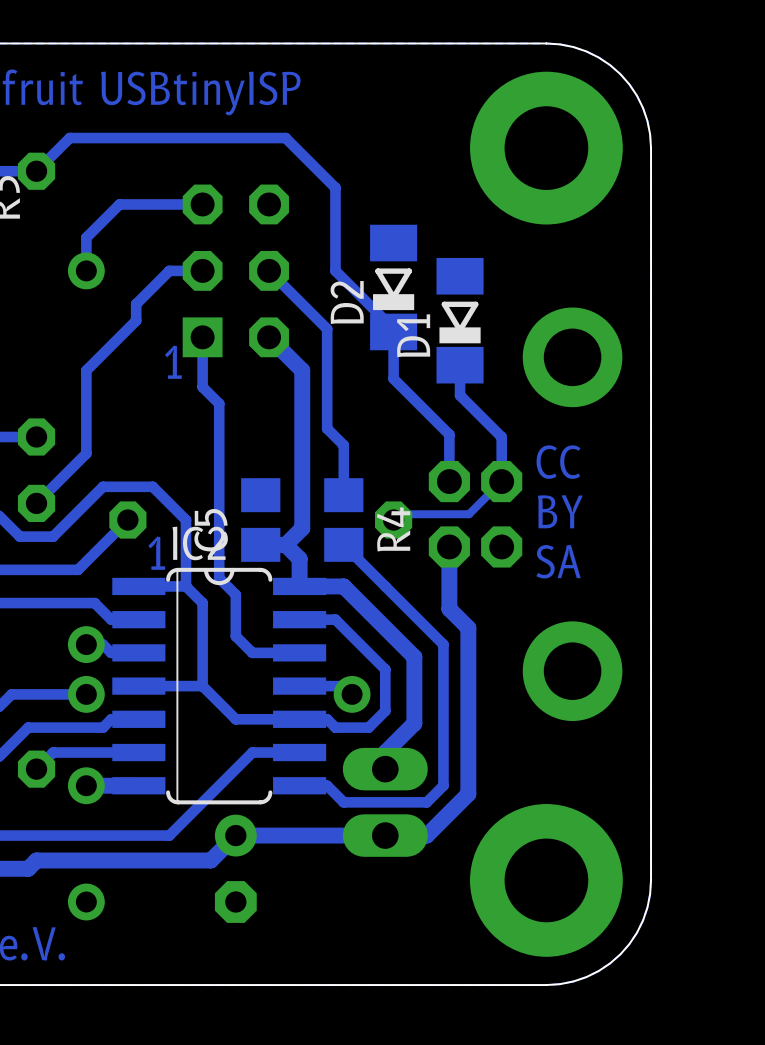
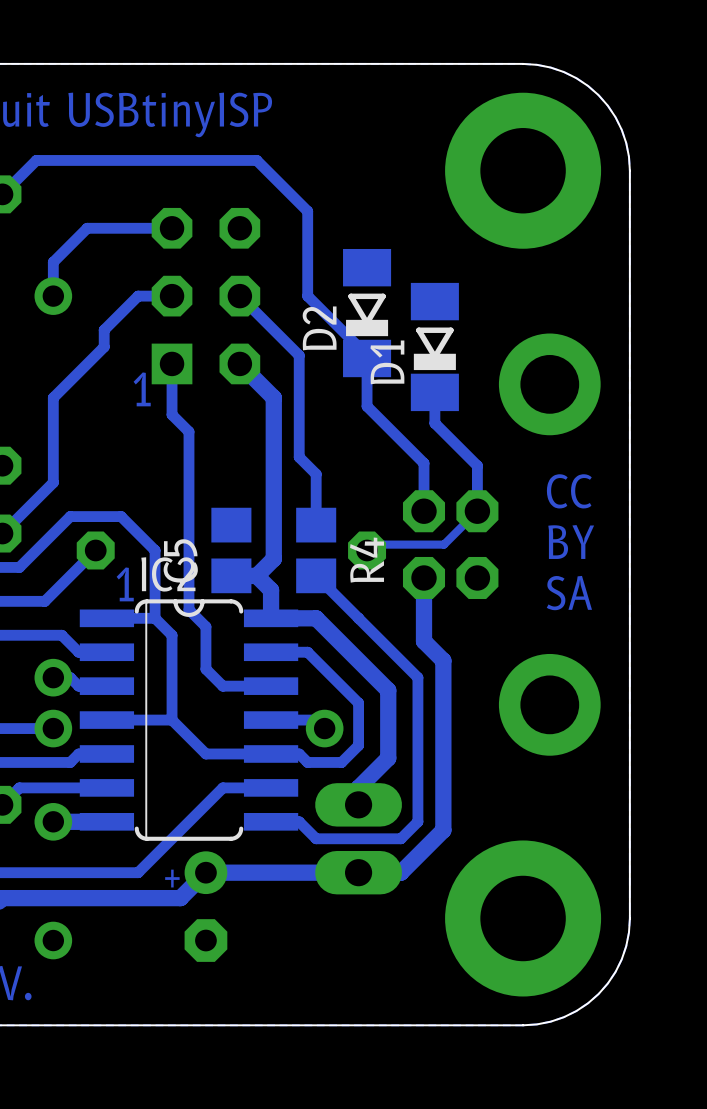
text position: CC (558, 462) -> CC (569, 491)
text position: BY (560, 511) -> BY (571, 542)
text position: SA (558, 561) -> SA (569, 593)
text: none -> + (172, 878)

